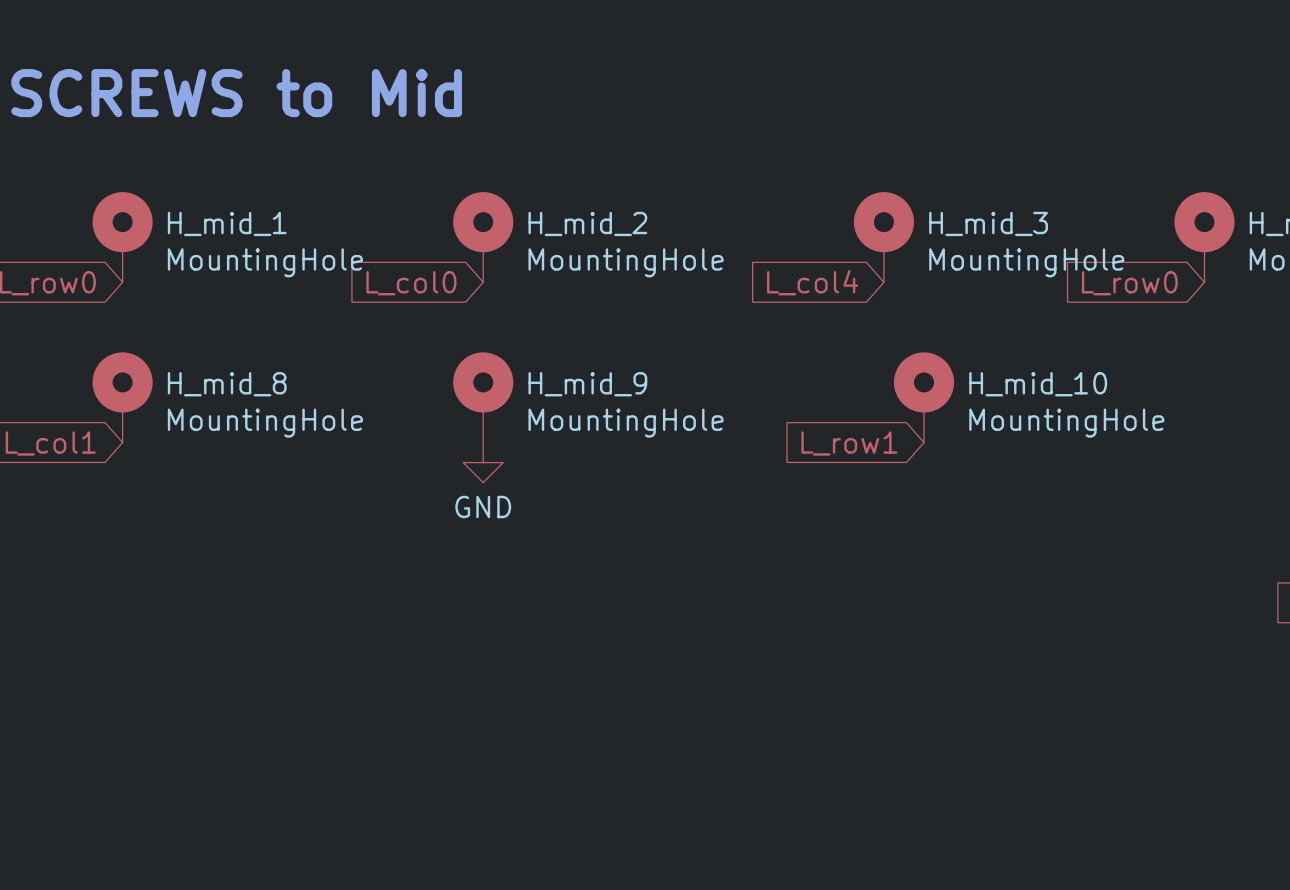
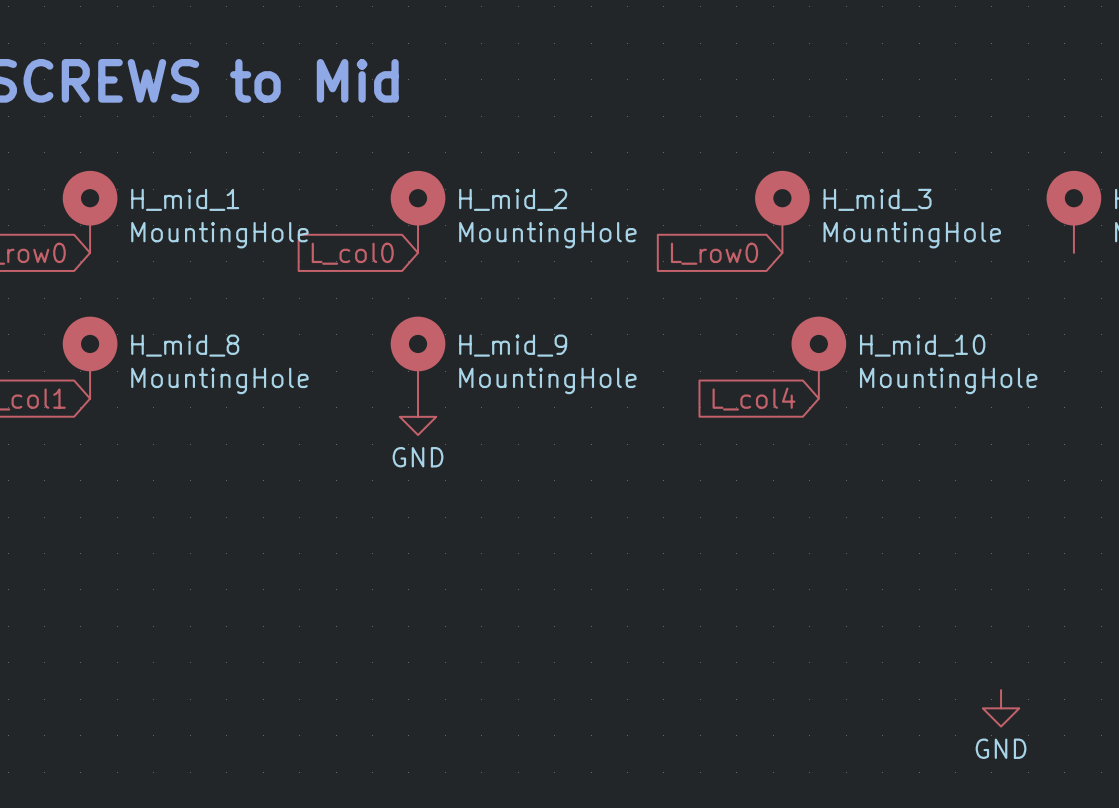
global label: L_col4 (812, 282) -> L_row0 (714, 253)
global label: L_row0 (1129, 283) -> none
global label: L_row1 (849, 443) -> L_col4 (753, 399)
power symbol: none -> GND (1001, 708)

